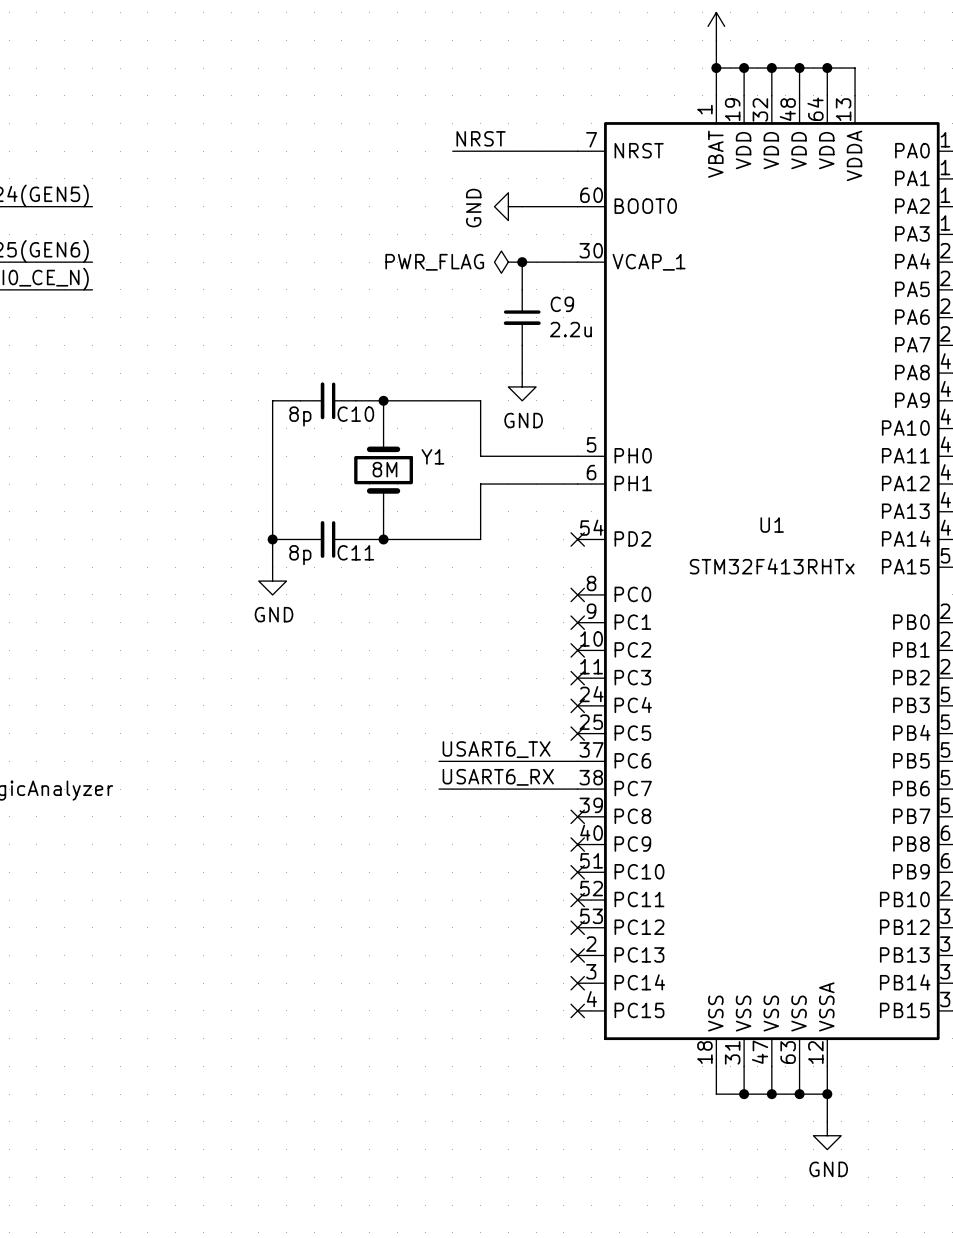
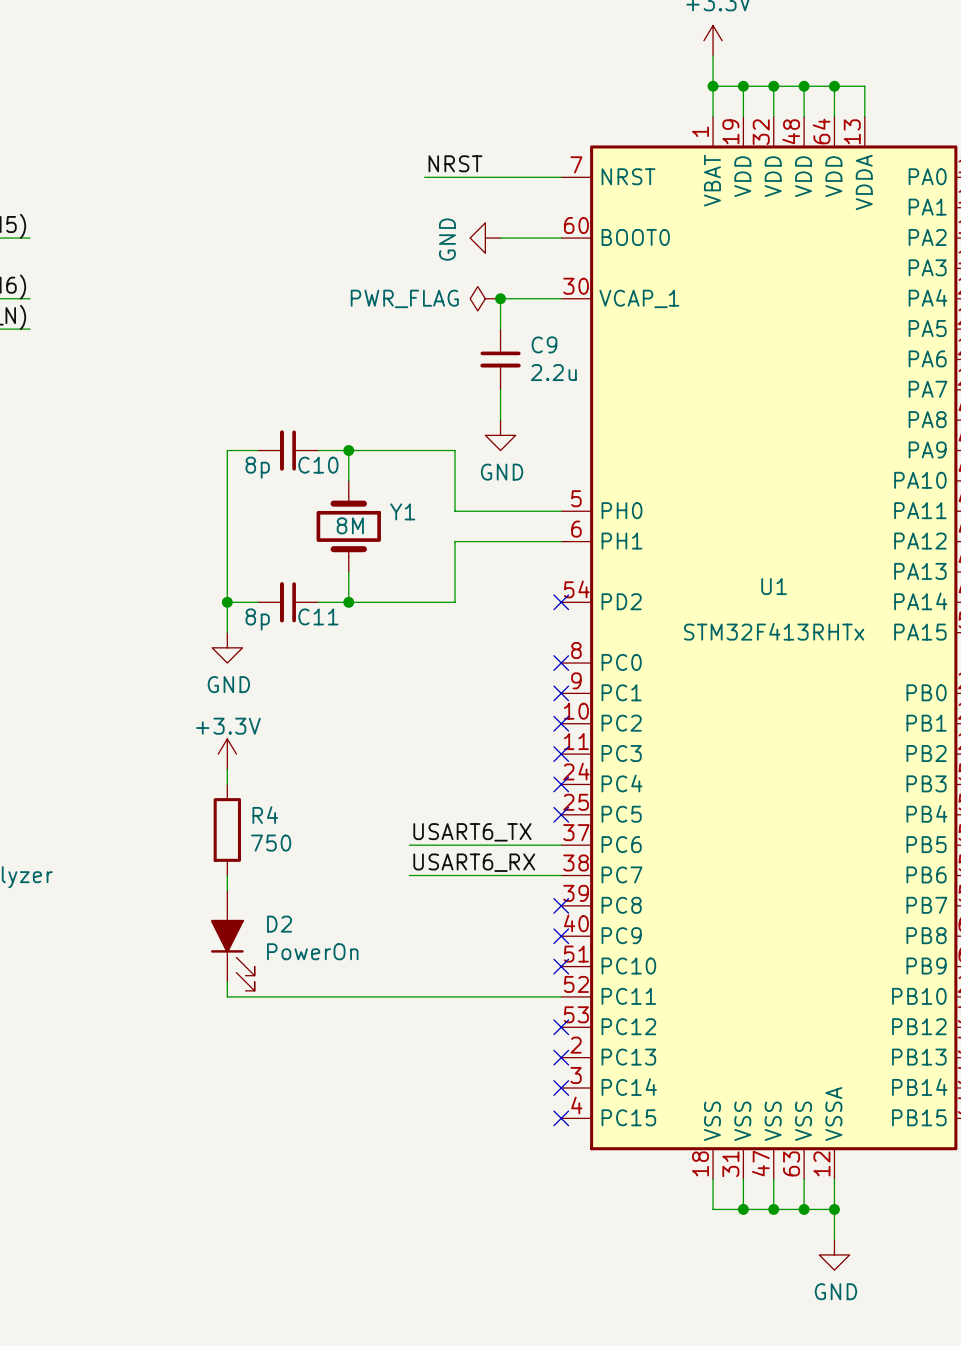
power symbol: none -> +3.3V (227, 754)
wire: none -> (227, 769) (227, 784)
R4: none -> 750 (227, 829)
wire: none -> (227, 875) (227, 890)
D2: none -> PowerOn (232, 940)
wire: none -> (227, 981) (227, 996) (561, 996)
no-connect mark: (577, 900) -> none

